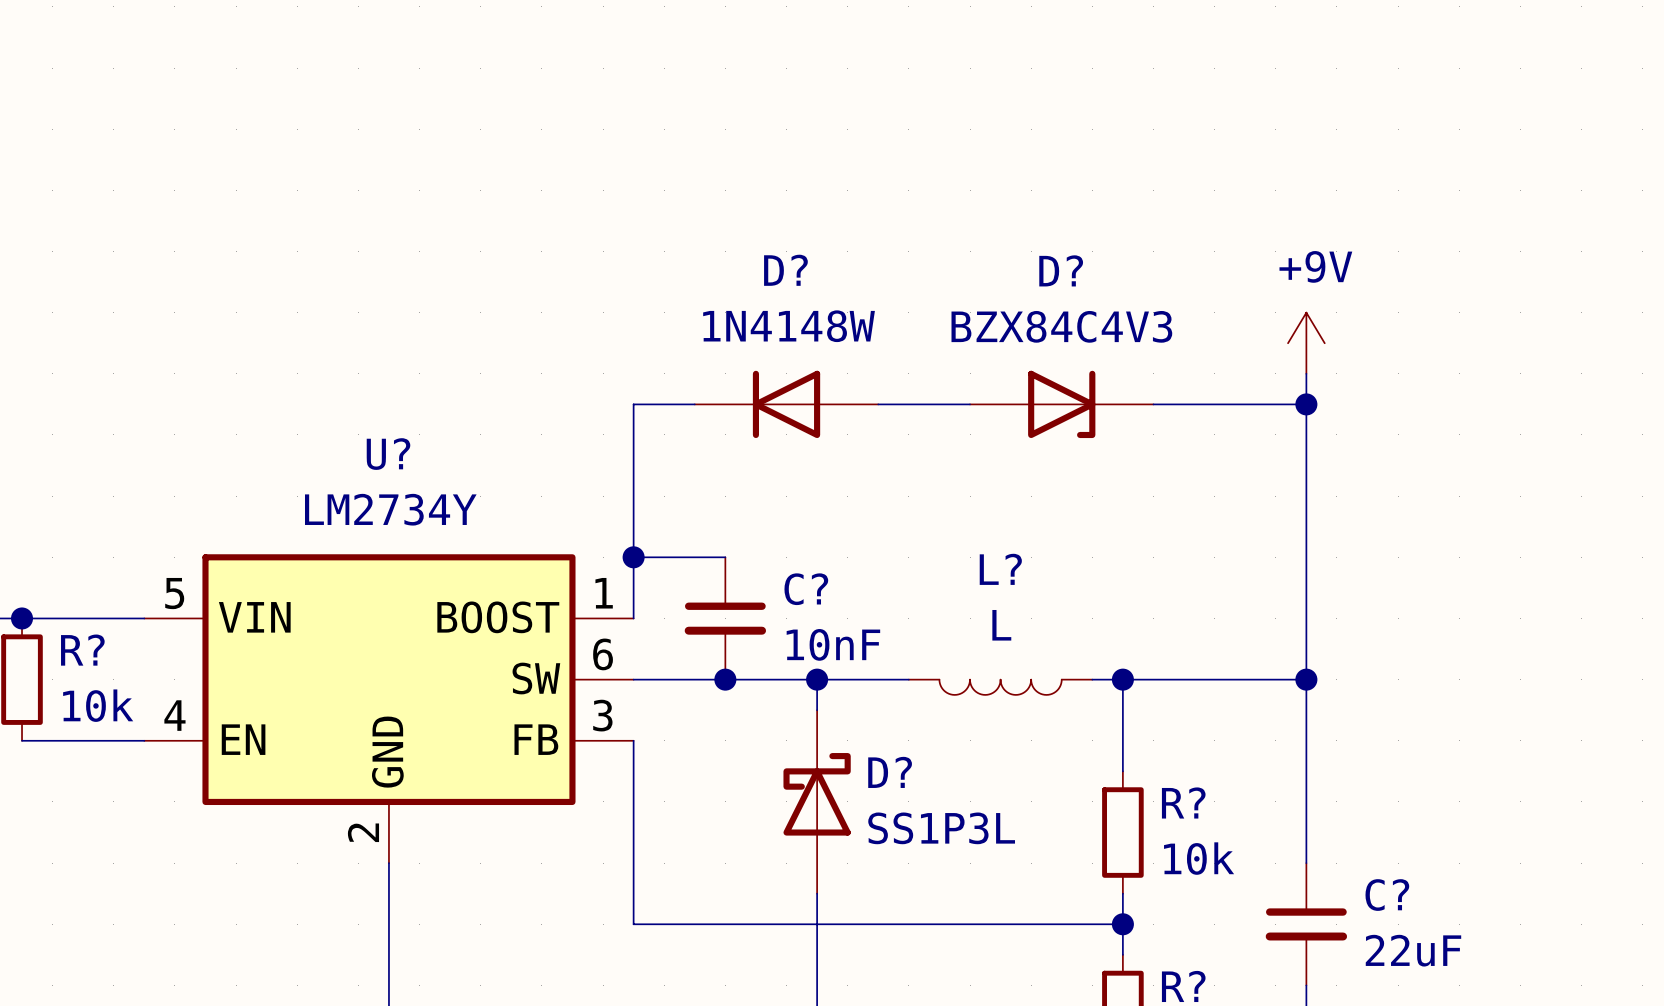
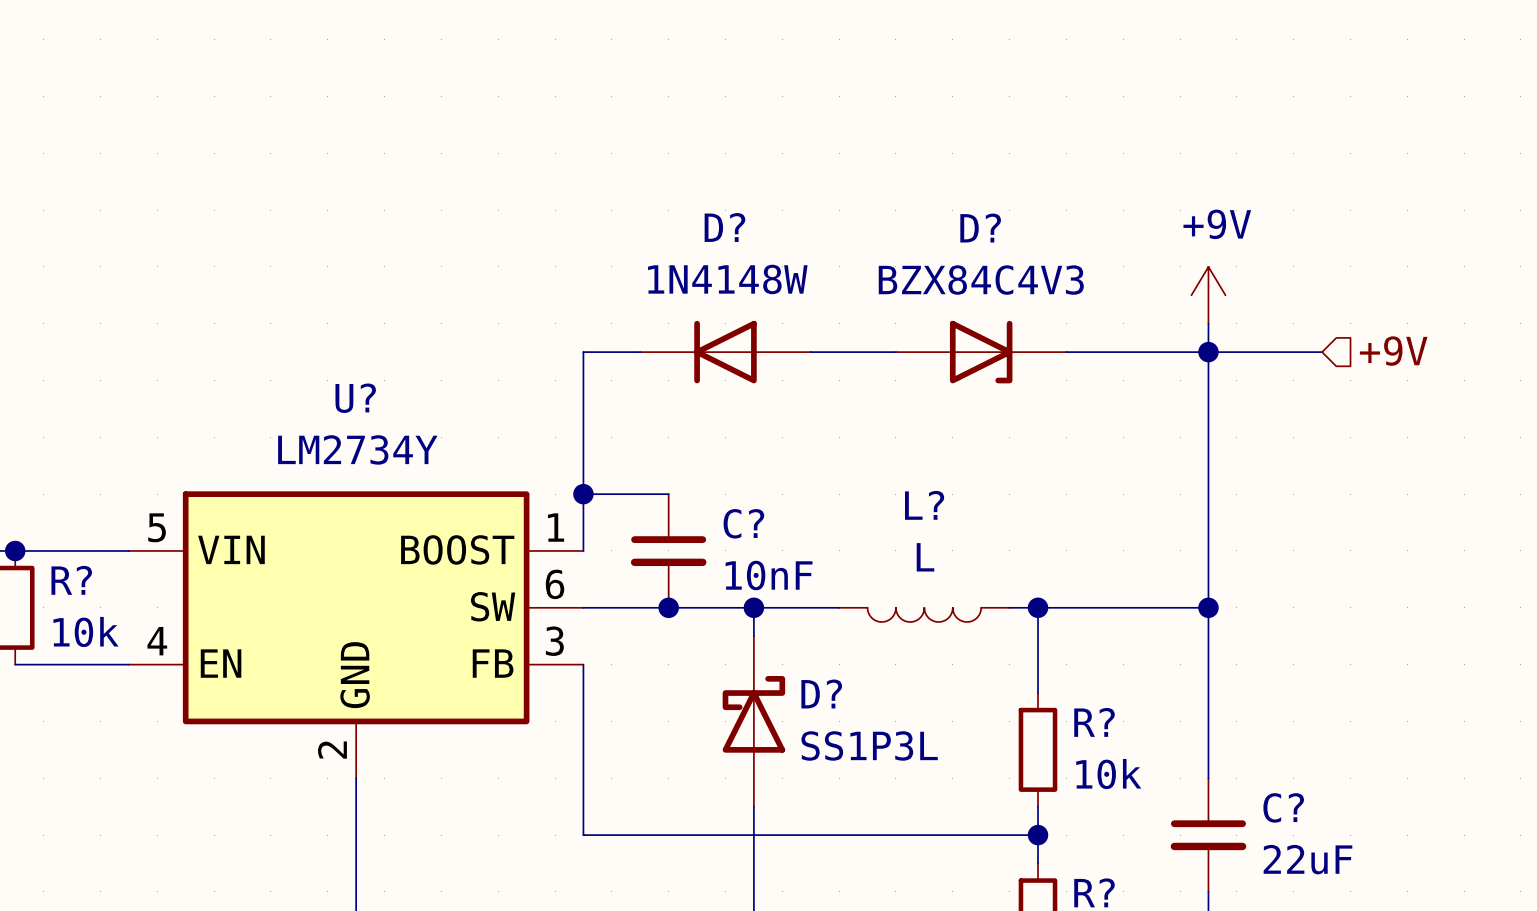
hierarchical label: none -> +9V (1393, 351)
wire: none -> (1208, 352) (1322, 352)

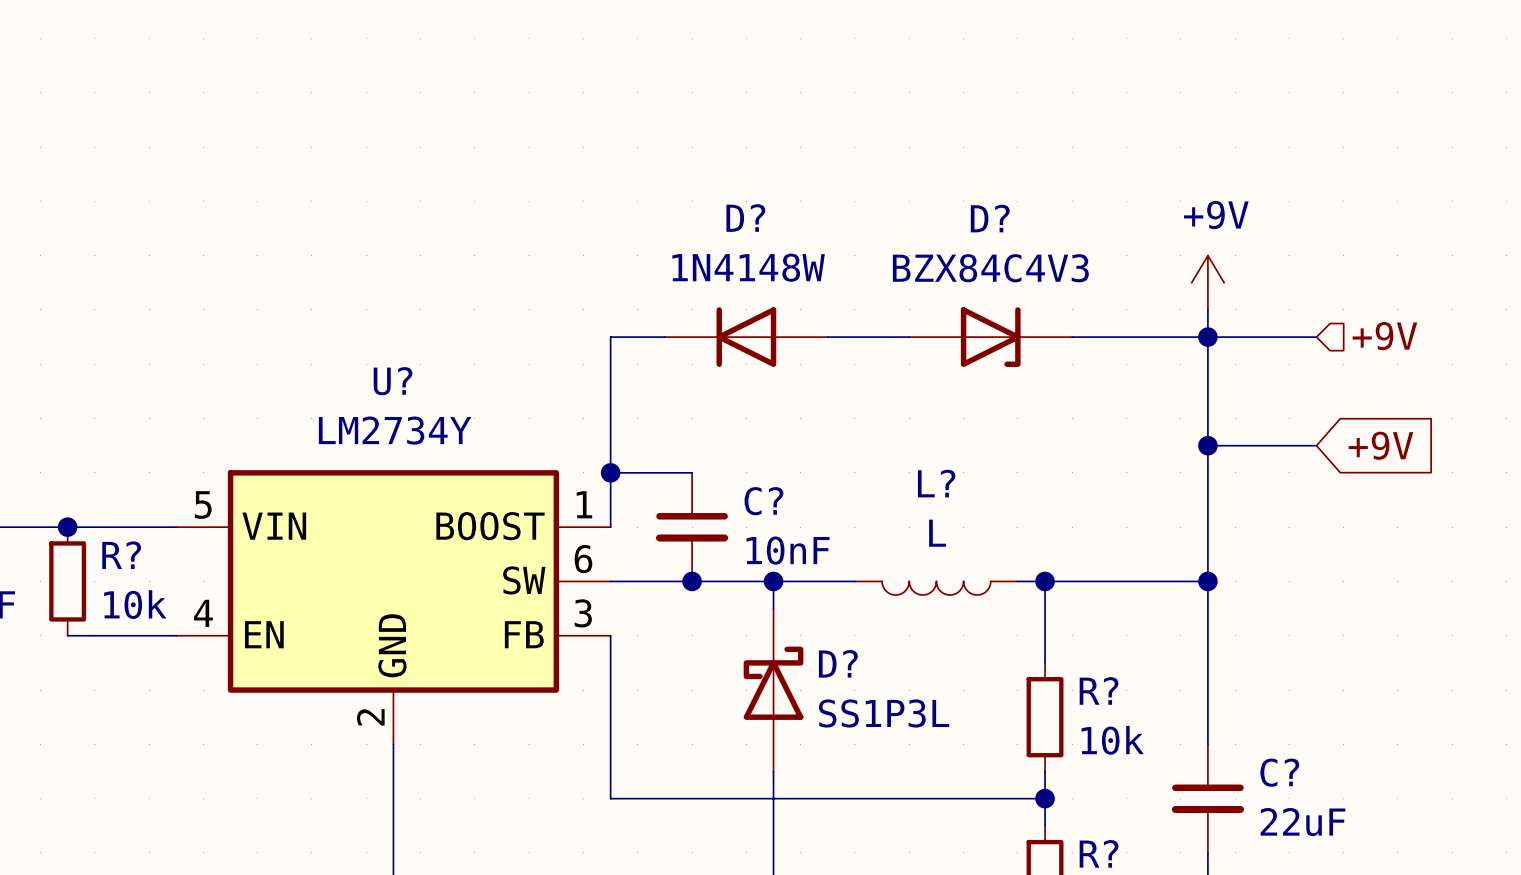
wire: none -> (1207, 445) (1316, 445)
junction: none -> (1207, 445)
global label: none -> +9V (1380, 445)

